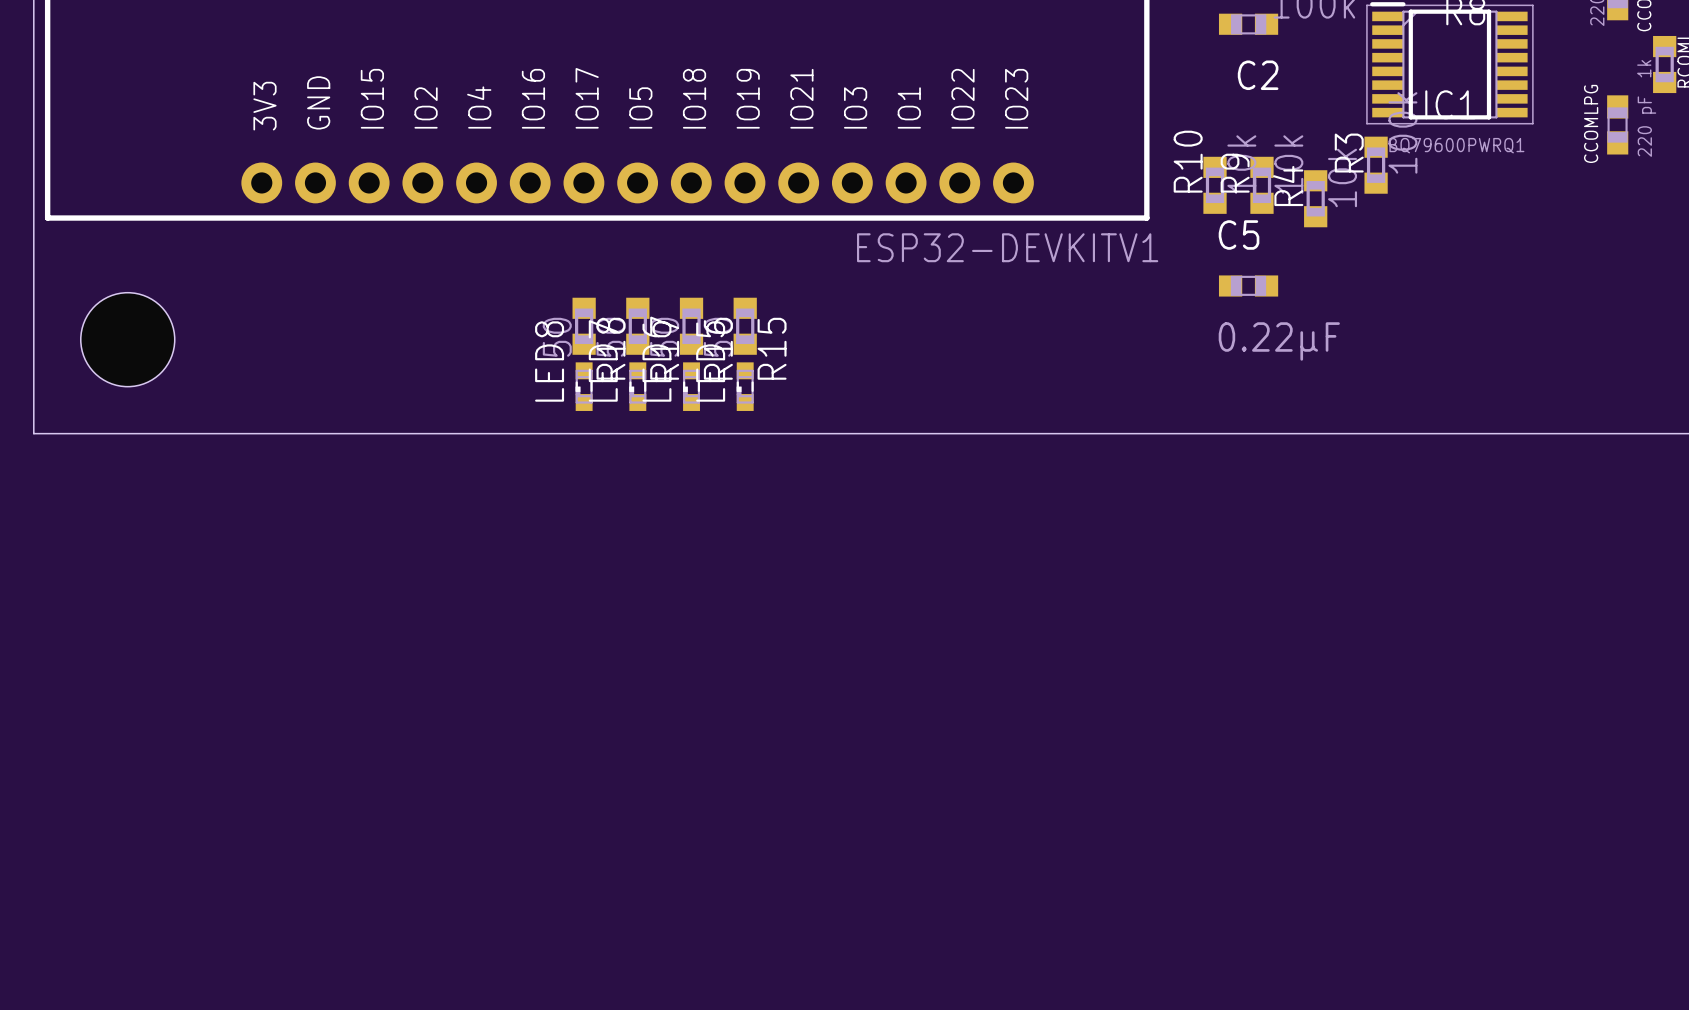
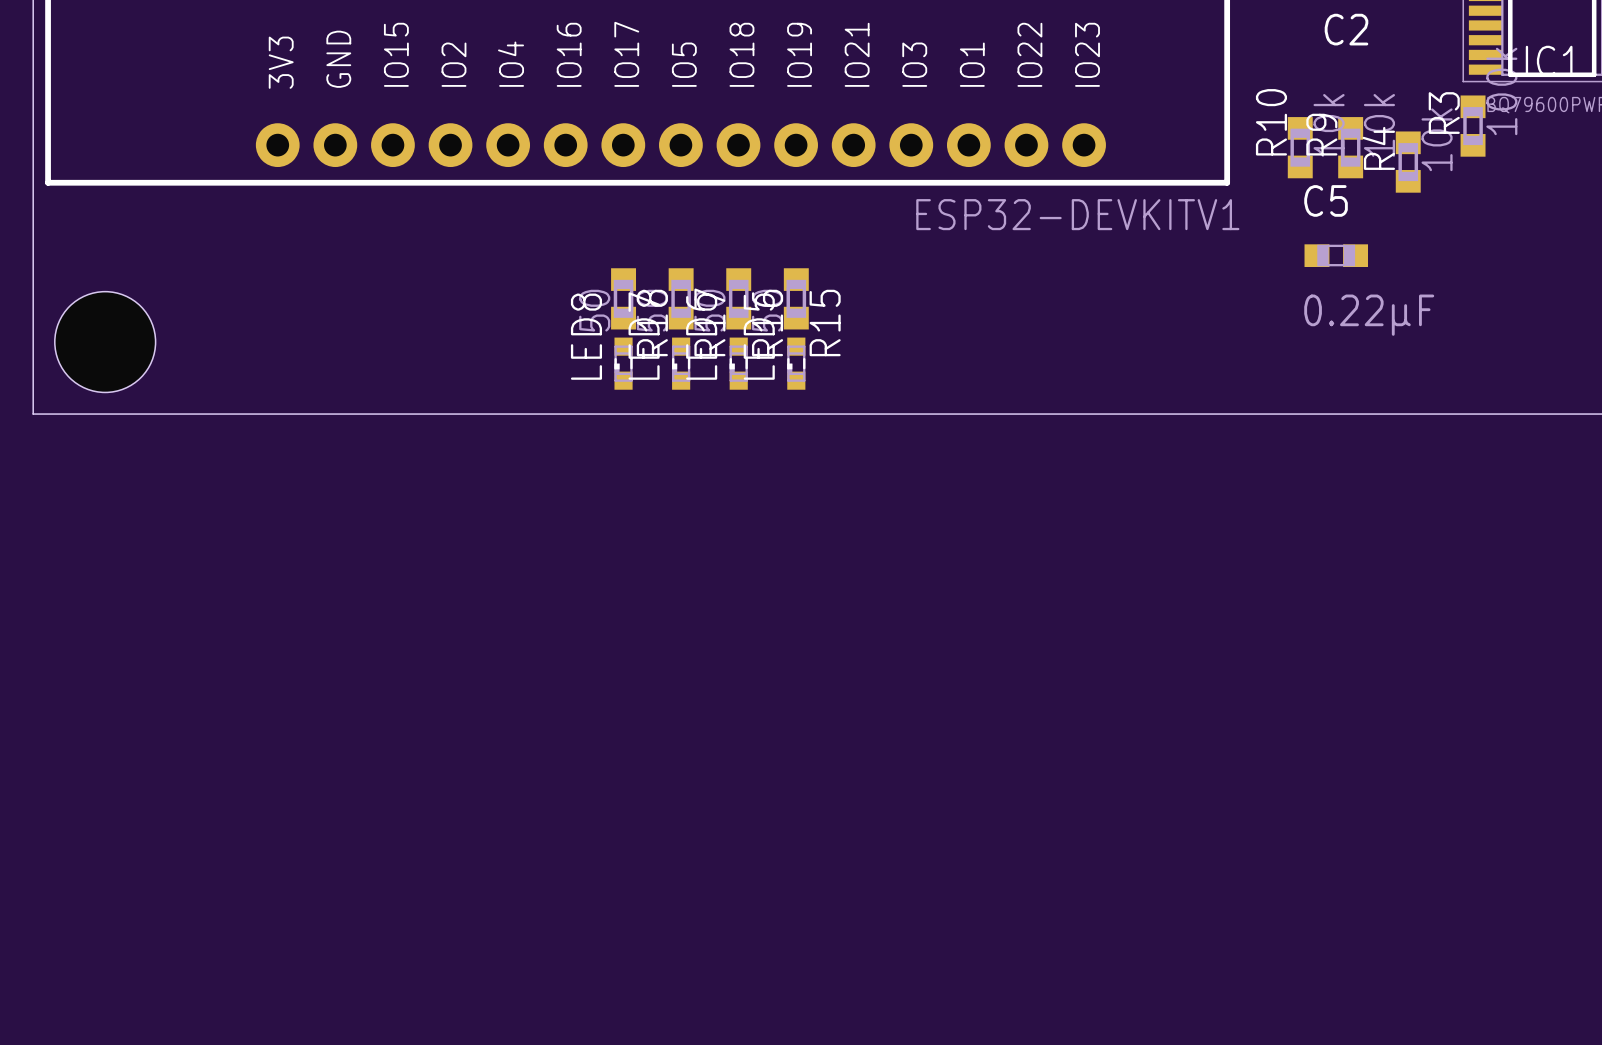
hole position: (127, 339) -> (105, 342)

